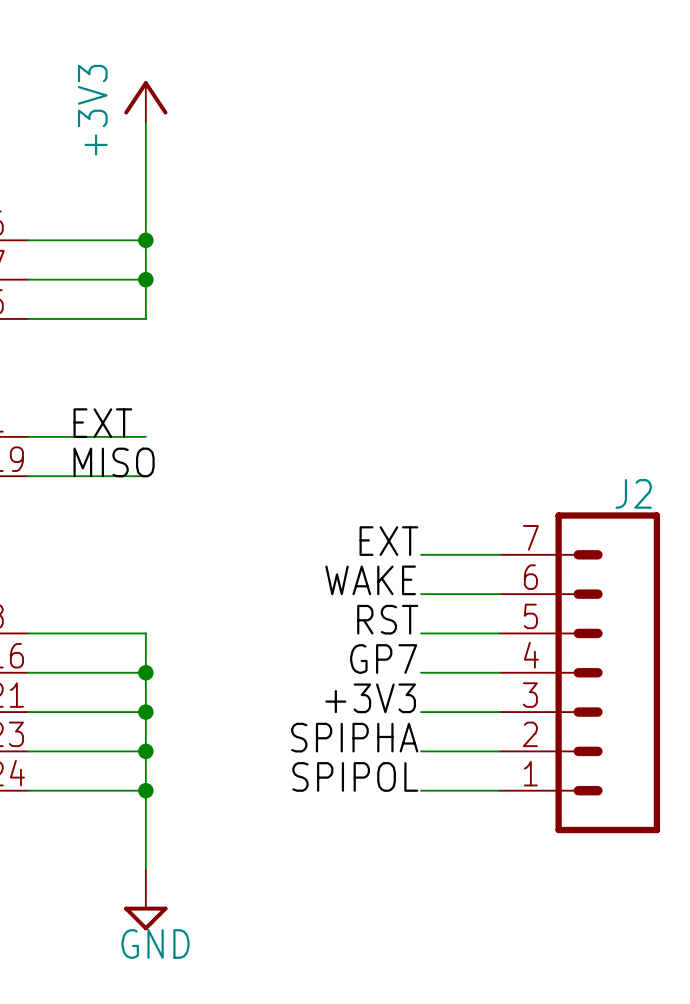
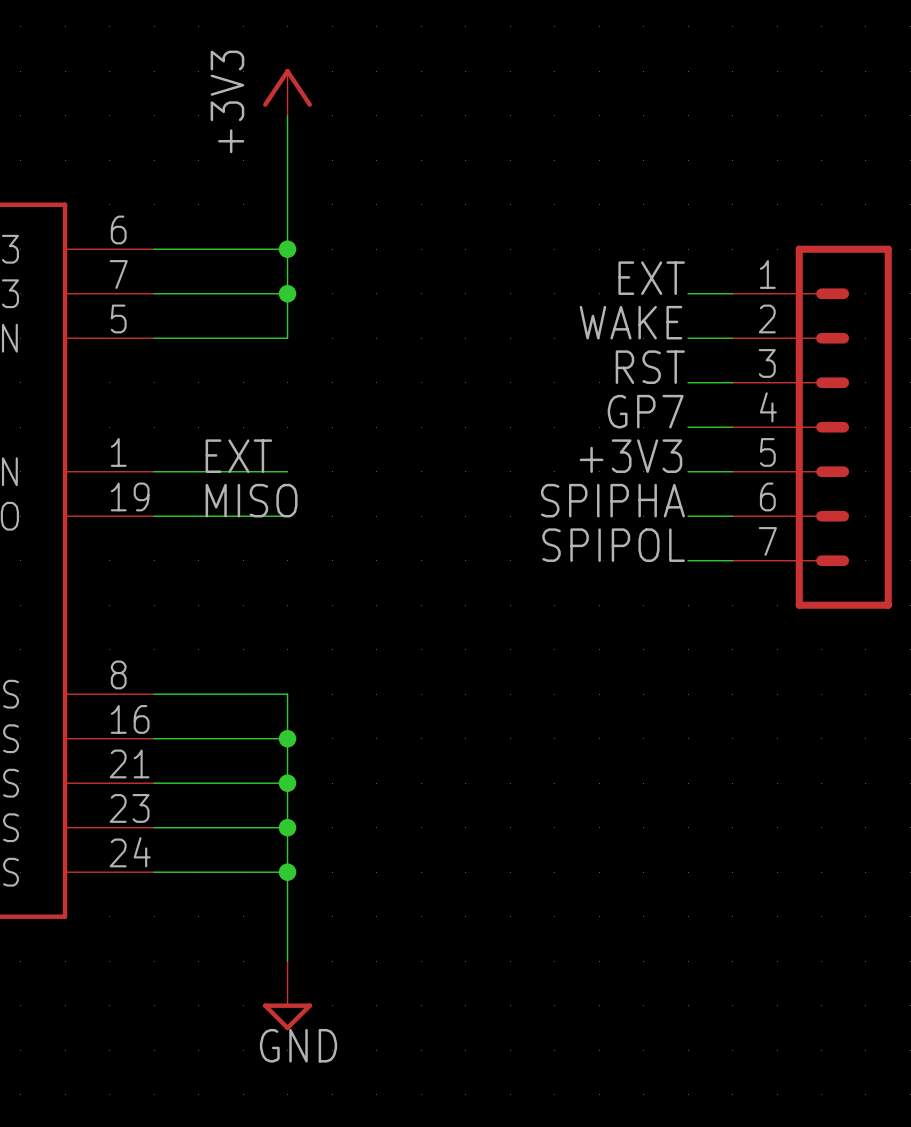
wire: none -> (688, 293) (732, 293)
wire: none -> (688, 338) (732, 338)
wire: none -> (688, 382) (732, 382)
wire: none -> (688, 427) (732, 427)
part: none -> (812, 427)
wire: none -> (688, 471) (732, 471)
wire: none -> (688, 516) (732, 516)
wire: none -> (688, 560) (732, 560)
label position: EXT (388, 541) -> EXT (651, 278)
wire: (421, 554) (499, 554) -> none
label position: WAKE (370, 580) -> WAKE (630, 322)
wire: (421, 594) (499, 594) -> none
label position: RST (387, 619) -> RST (650, 367)
wire: (421, 633) (499, 633) -> none
label position: GP7 (383, 659) -> GP7 (645, 411)
wire: (421, 672) (499, 672) -> none
J2: (579, 672) -> none
label position: +3V3 (370, 698) -> +3V3 (630, 456)
wire: (421, 712) (499, 712) -> none
label position: SPIPHA (354, 737) -> SPIPHA (612, 500)
wire: (421, 751) (499, 751) -> none
label position: SPIPOL (355, 776) -> SPIPOL (613, 545)
wire: (421, 790) (499, 790) -> none

